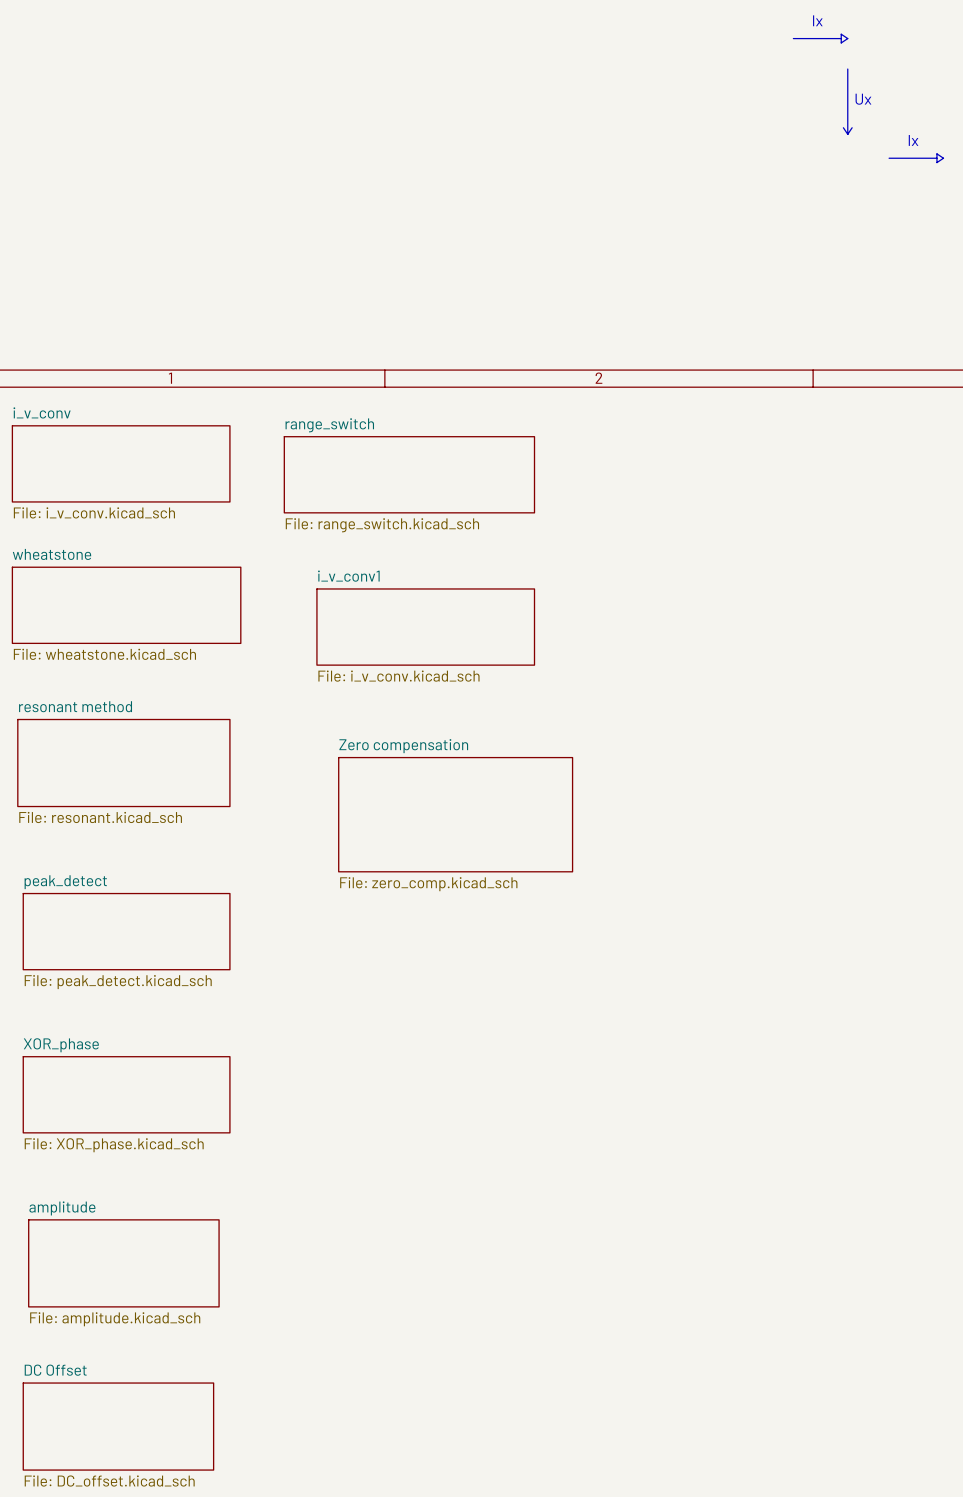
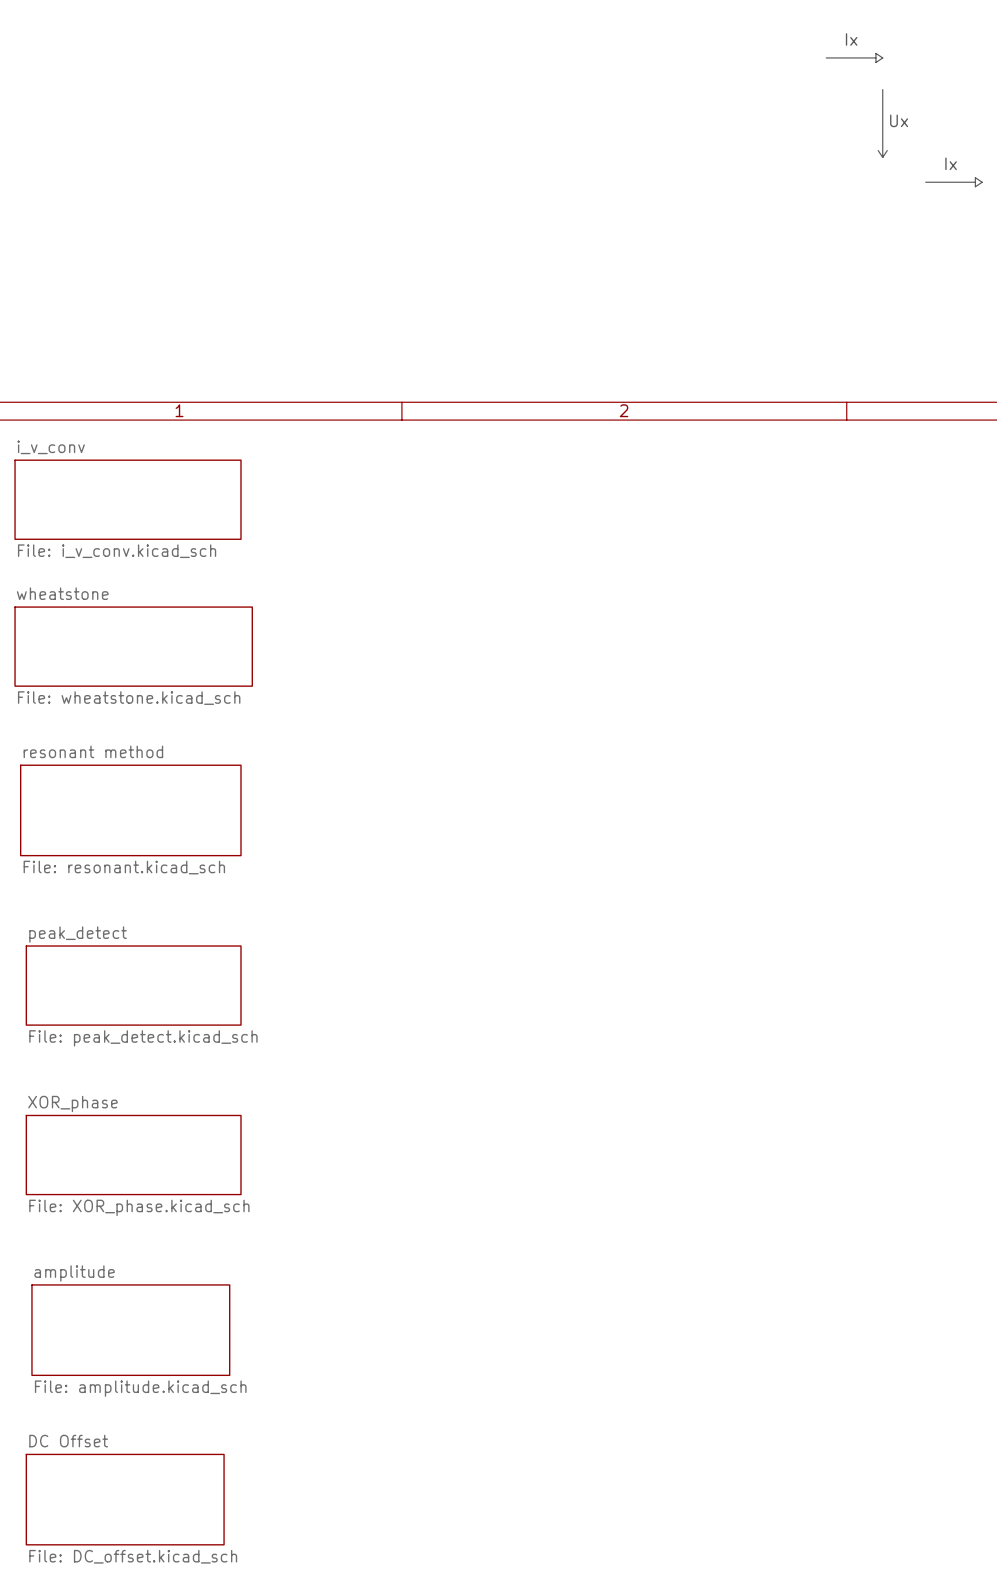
sheet range_switch: File: range_switch.kicad_sch (409, 474) -> none
sheet i_v_conv1: File: i_v_conv.kicad_sch (425, 627) -> none
sheet Zero compensation: File: zero_comp.kicad_sch (455, 814) -> none

